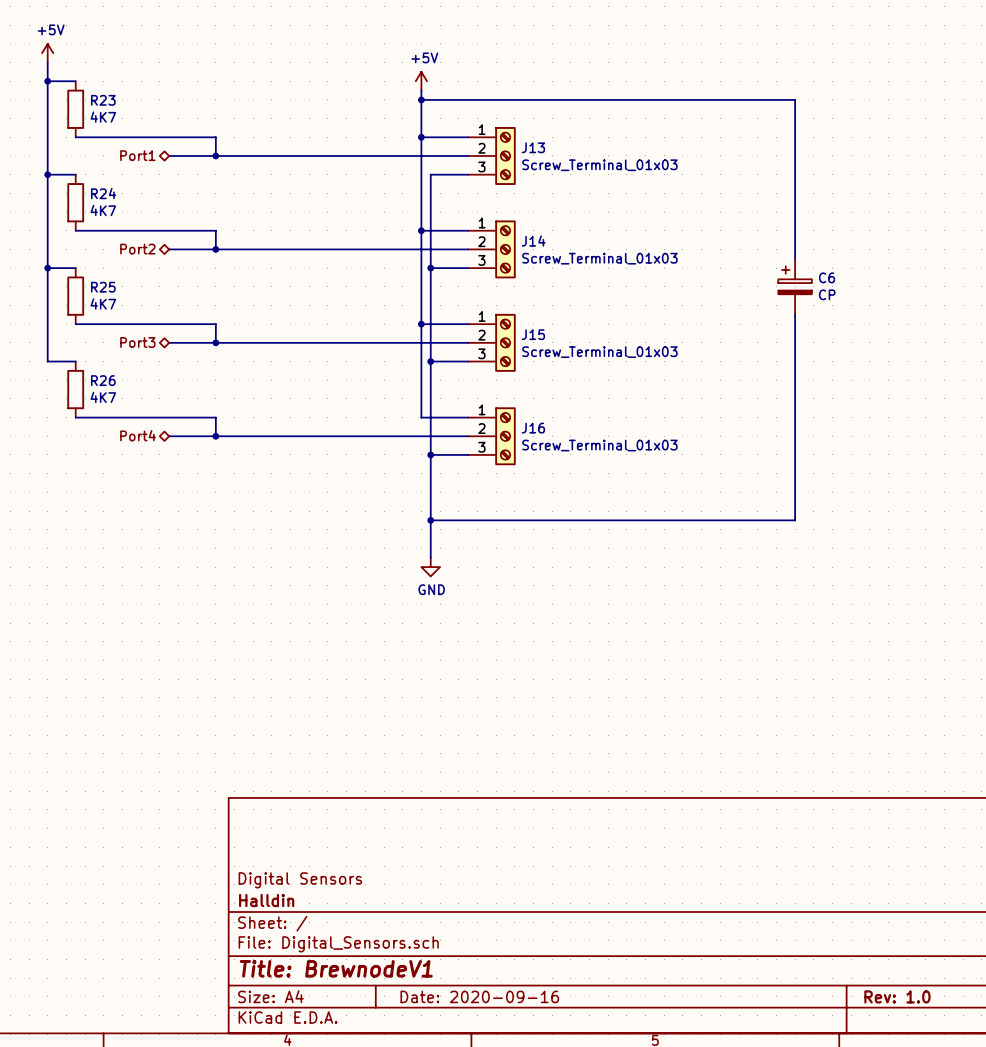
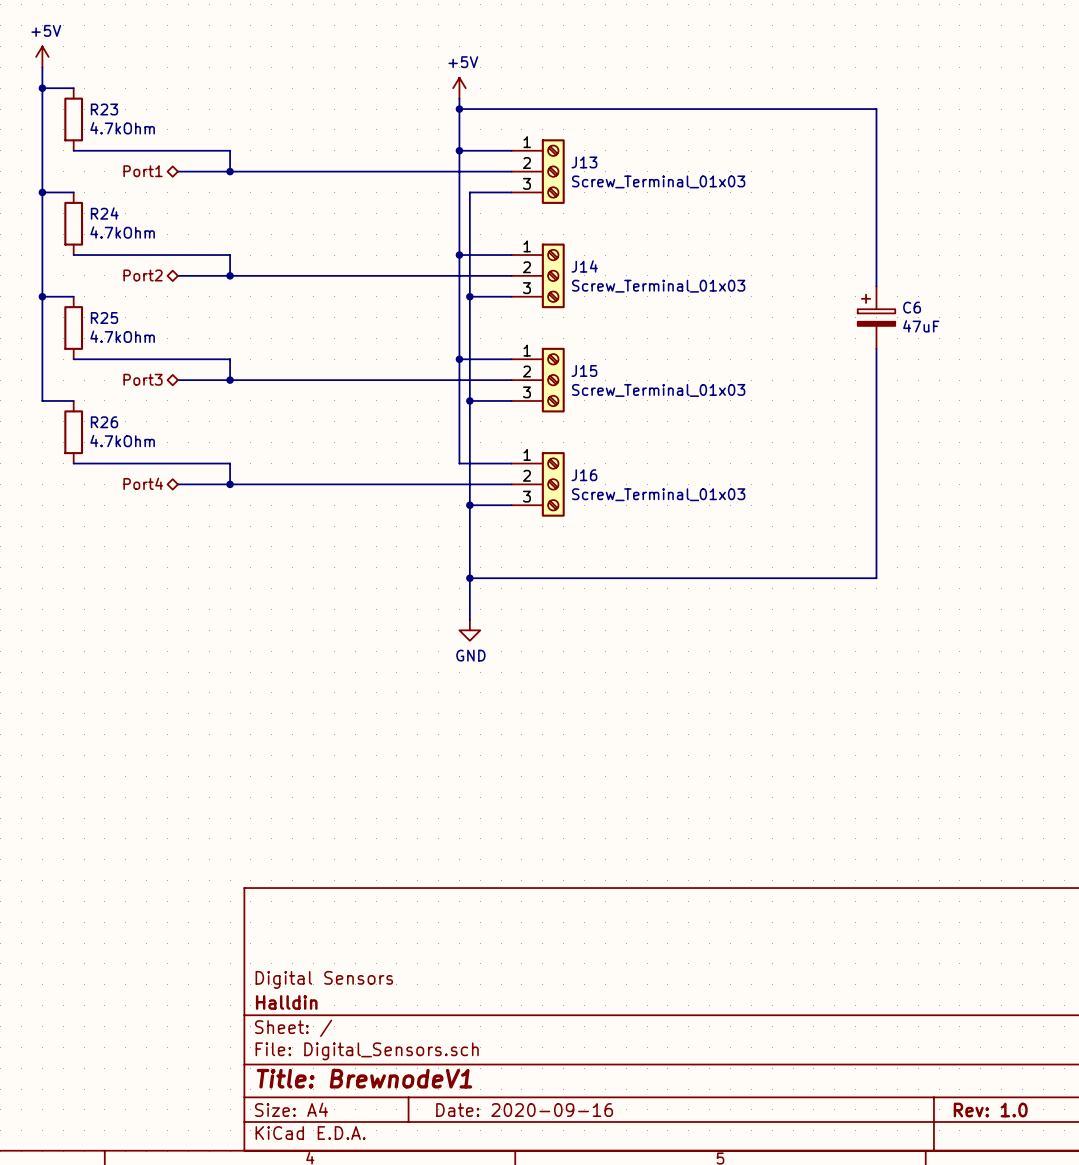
R23 value: 4K7 (103, 117) -> 4.7kOhm (122, 128)
R24 value: 4K7 (103, 210) -> 4.7kOhm (122, 232)
C6 value: CP (827, 294) -> 47uF (921, 326)
R25 value: 4K7 (103, 303) -> 4.7kOhm (122, 336)
R26 value: 4K7 (103, 397) -> 4.7kOhm (122, 441)

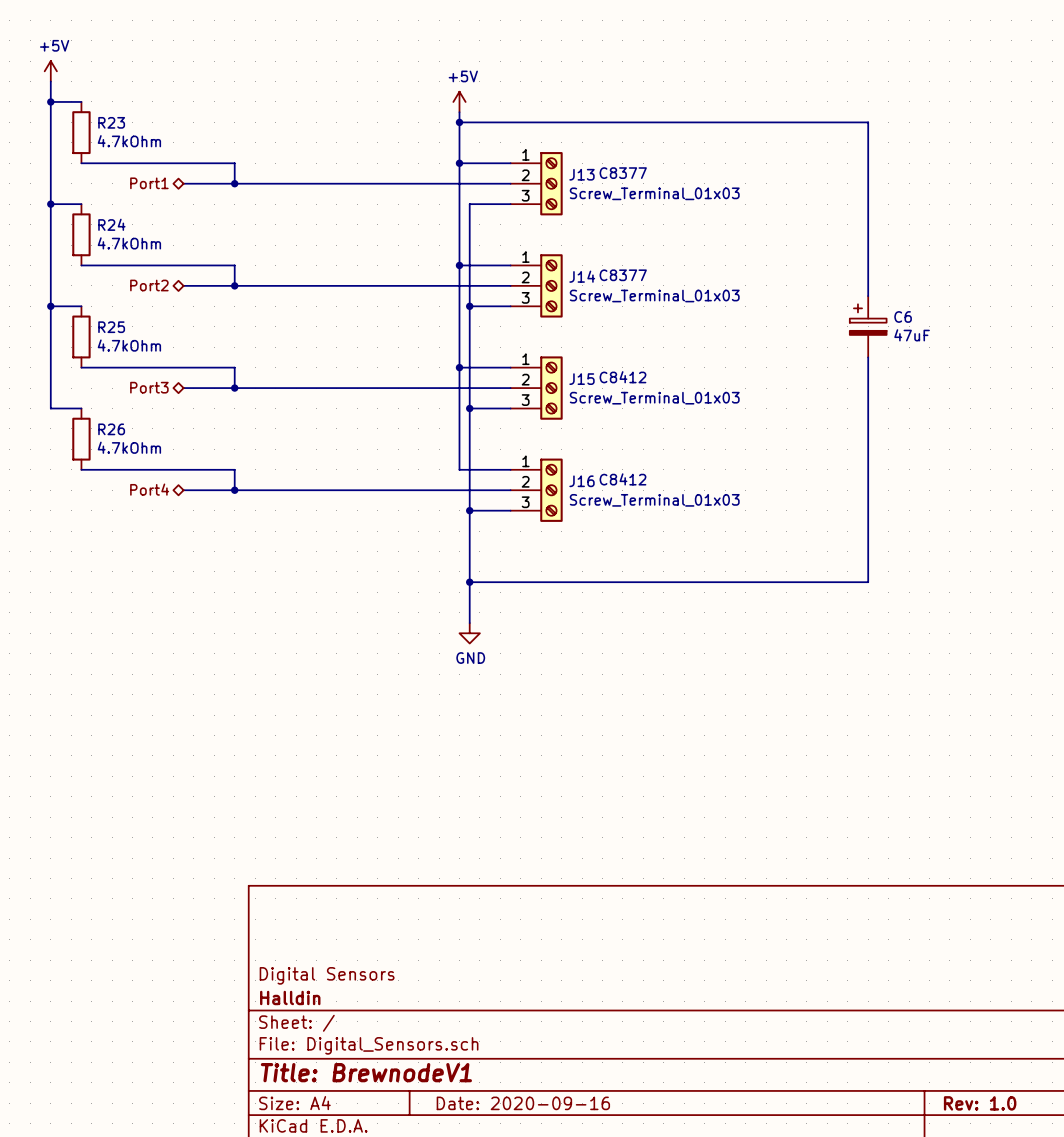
J13 text: none -> C8377 (623, 173)
J14 text: none -> C8377 (623, 275)
J15 text: none -> C8412 (622, 377)
J16 text: none -> C8412 (622, 479)

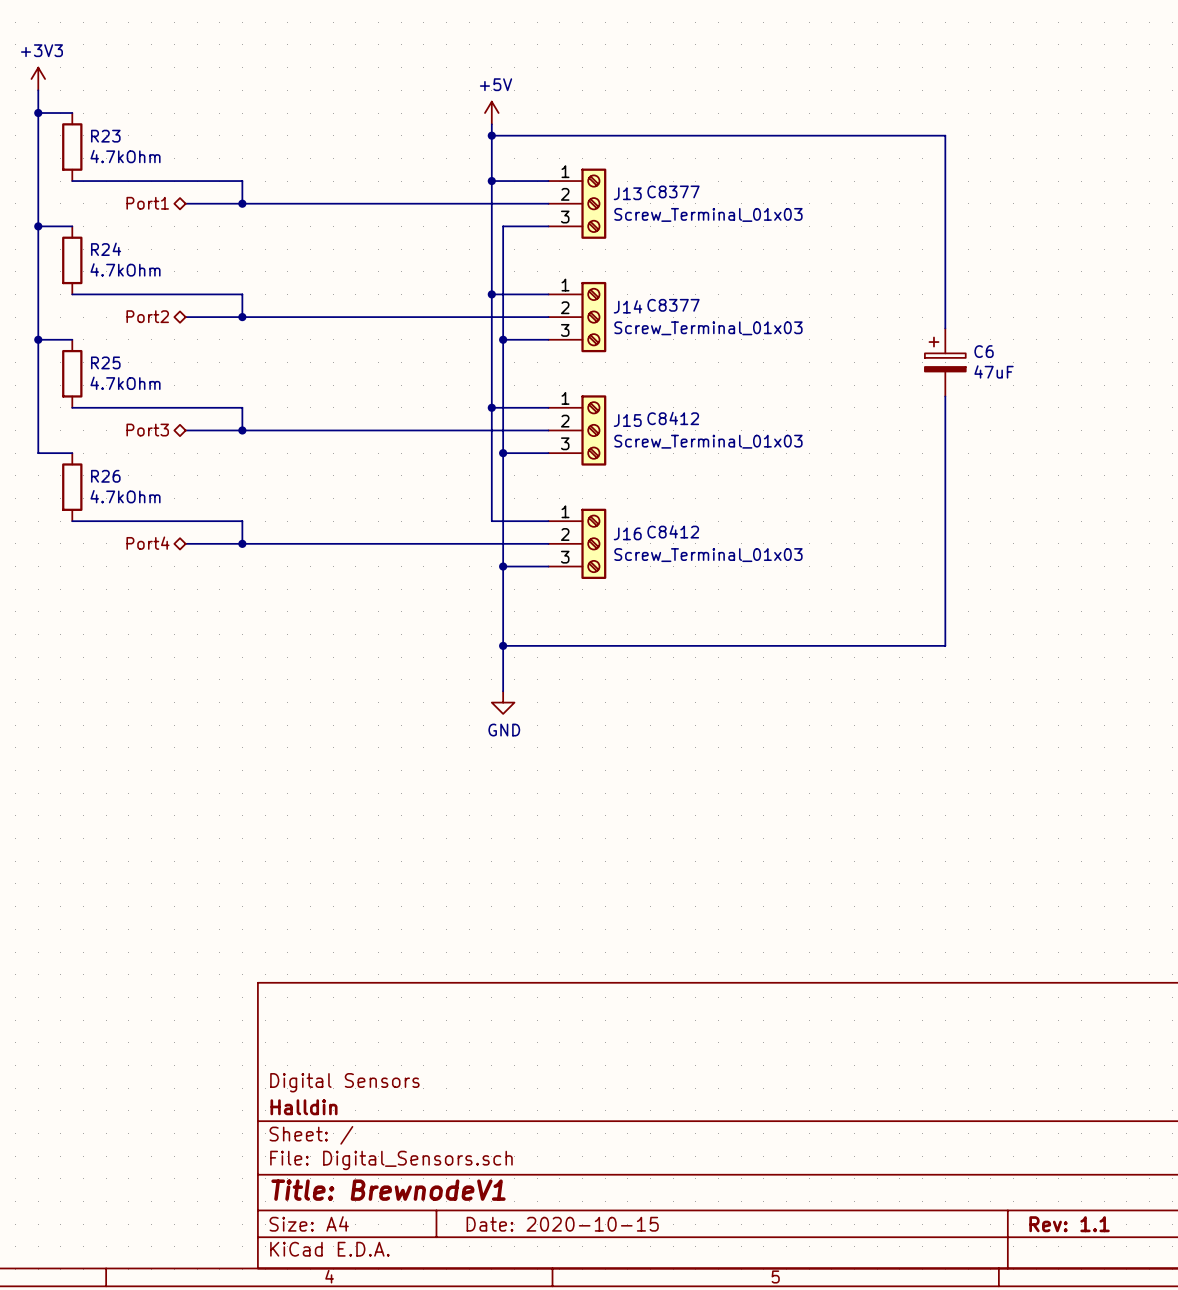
power symbol: +5V (50, 71) -> +3V3 (38, 78)
title block: Date: 2020-09-16 (523, 1103) -> Date: 2020-10-15 (562, 1224)
title block: Rev: 1.0 (980, 1103) -> Rev: 1.1 (1069, 1224)

